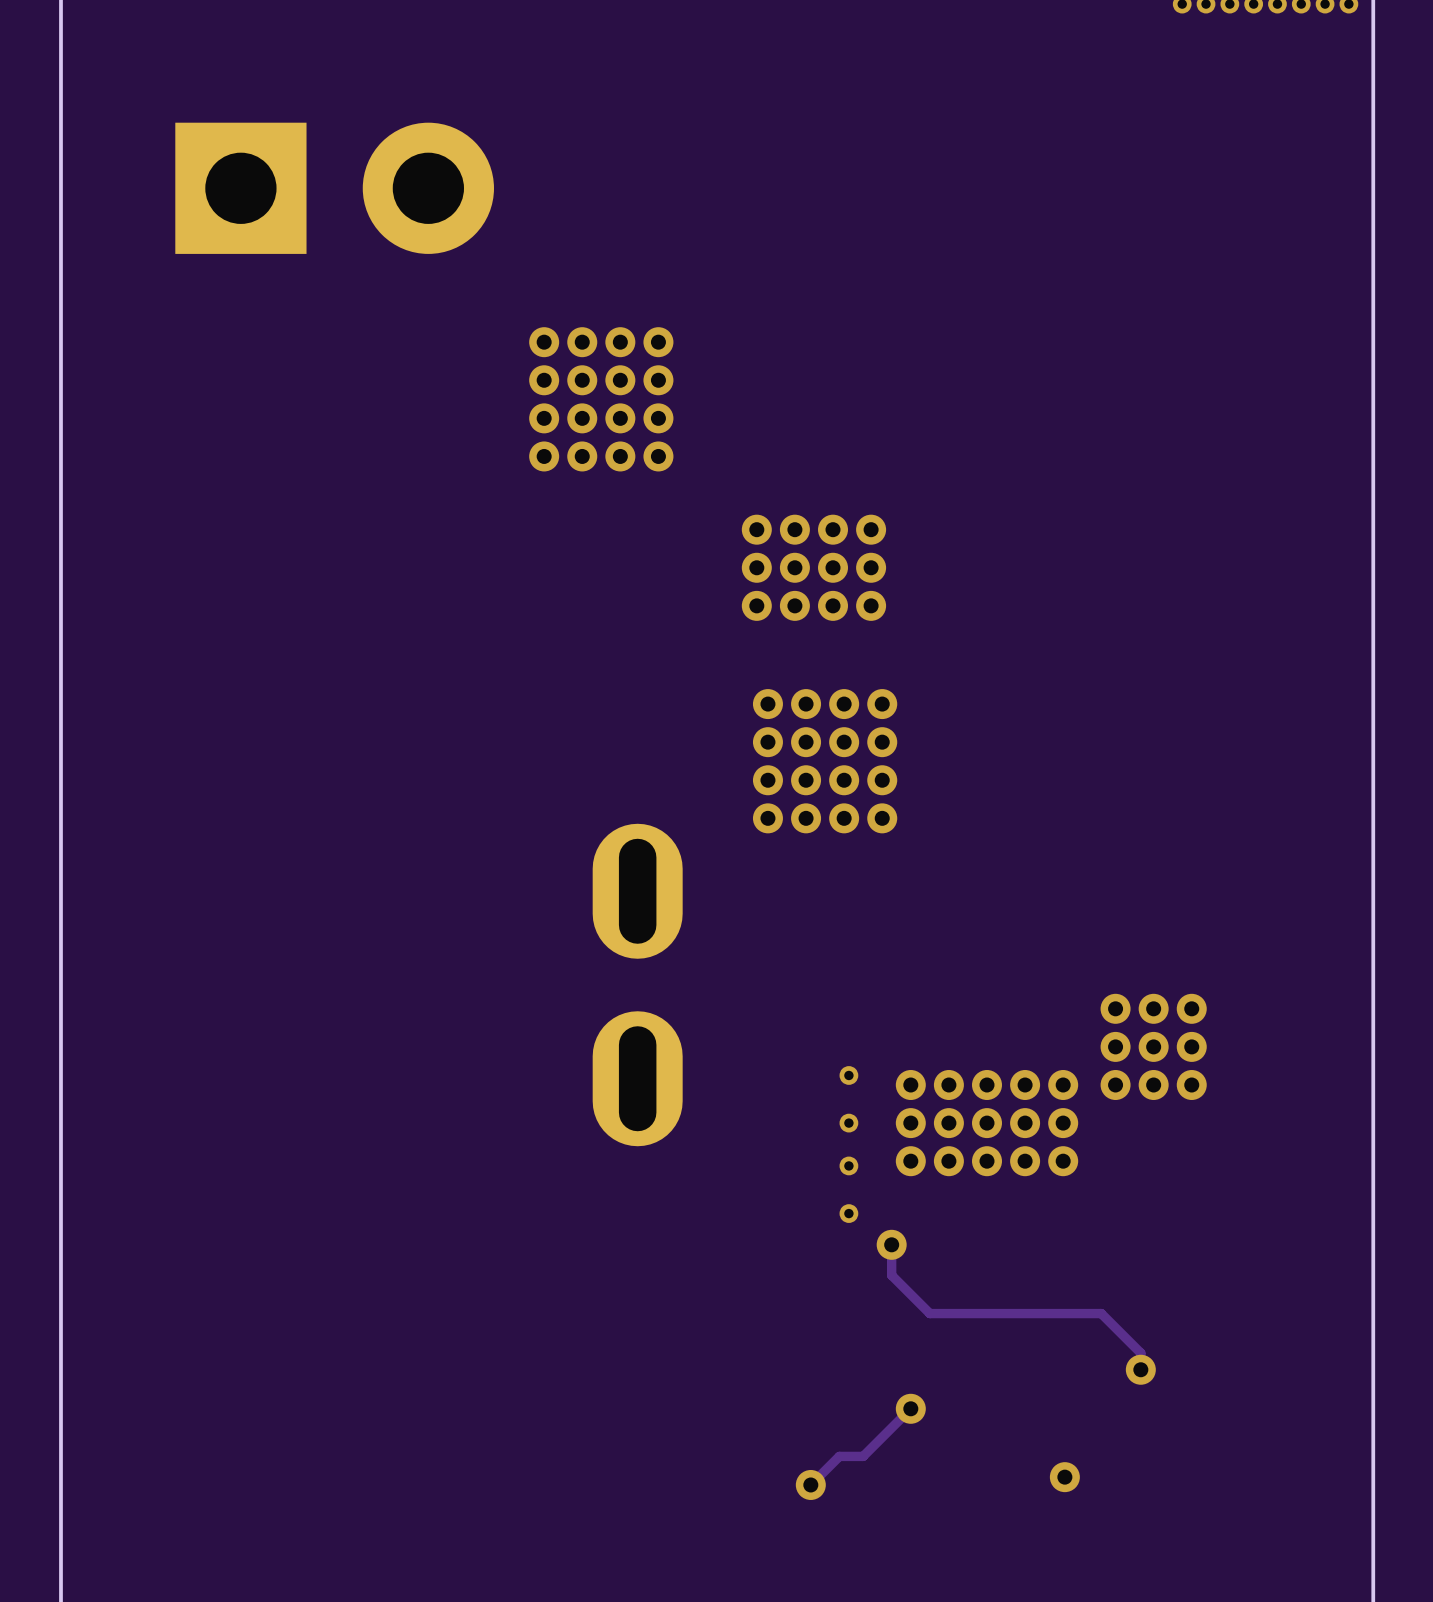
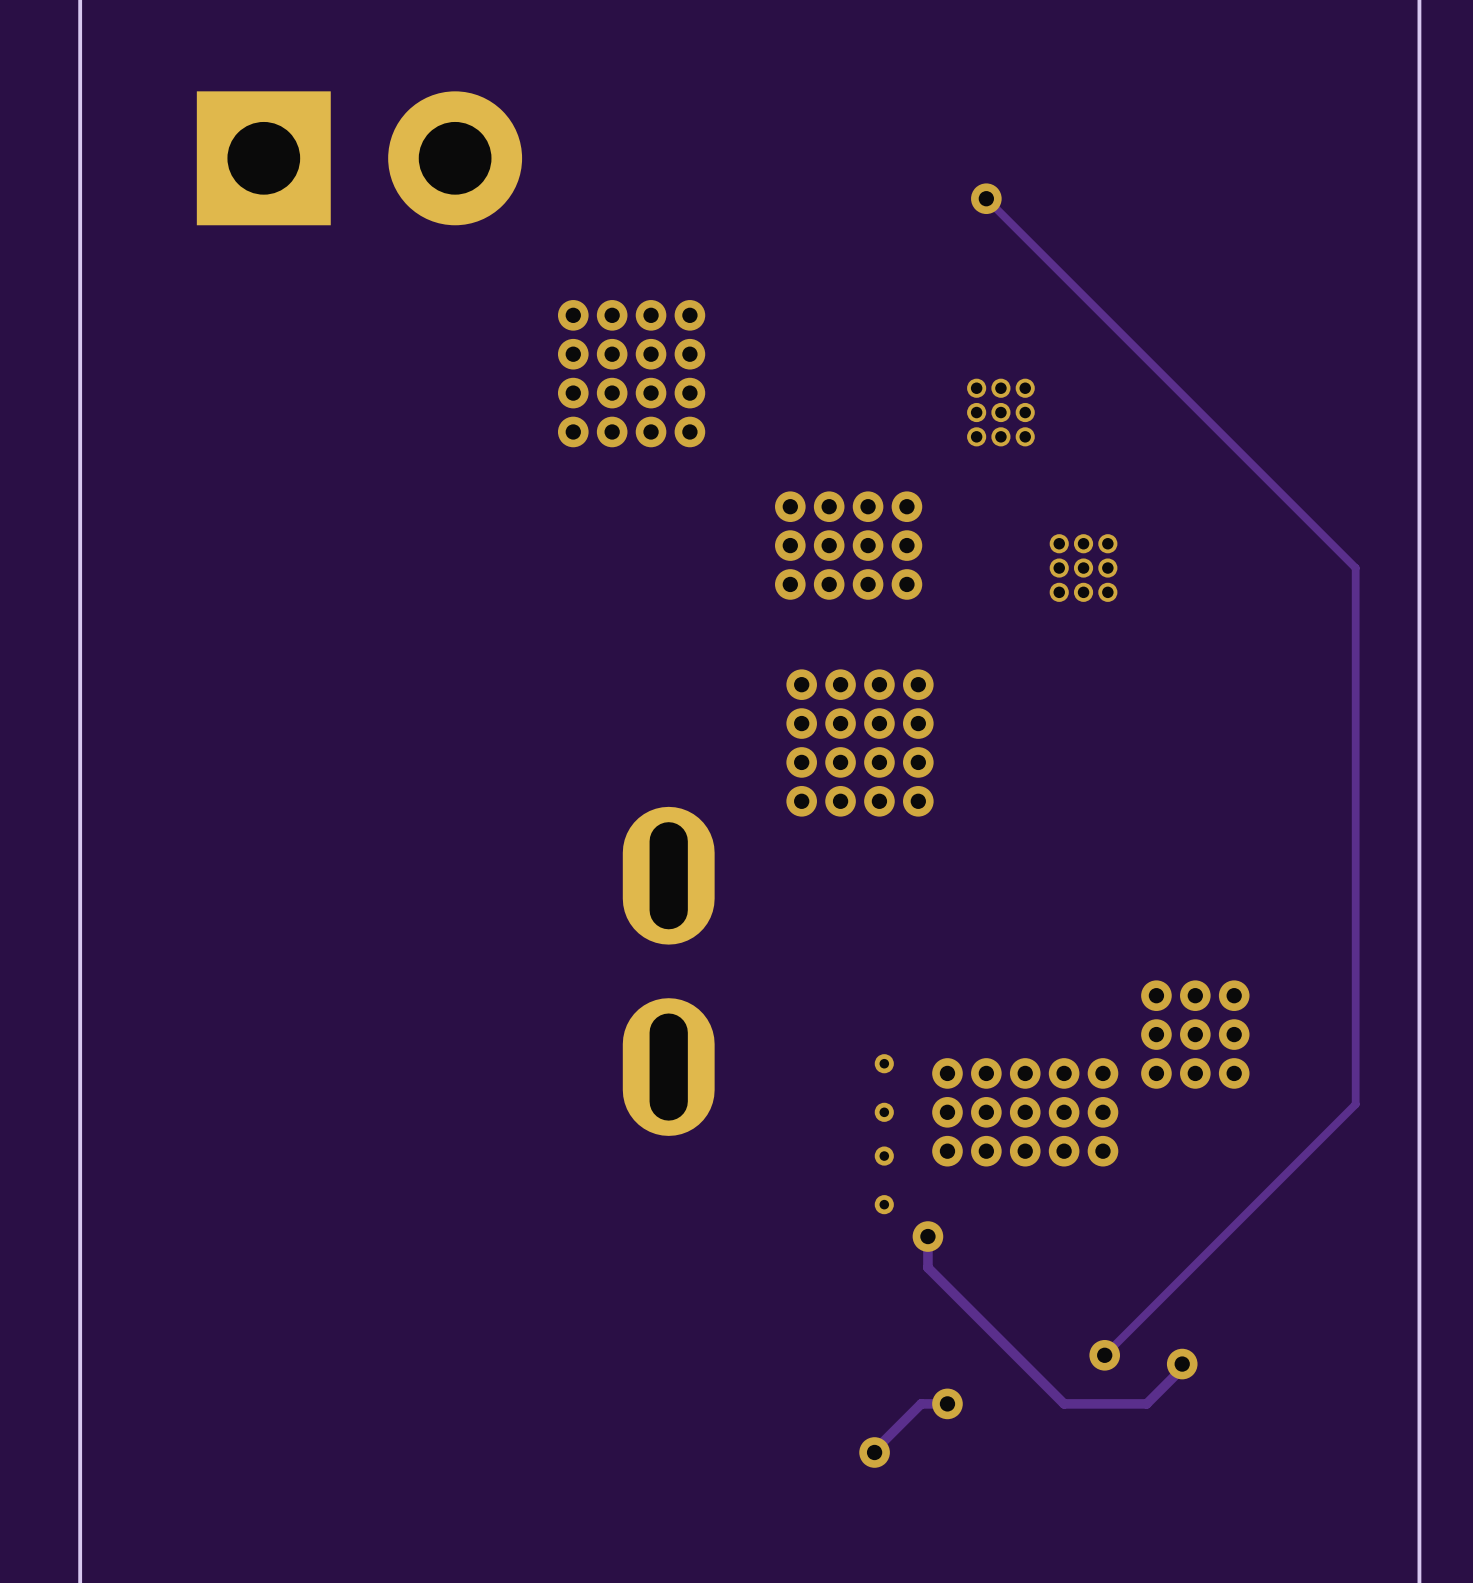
track: none -> (986, 198) (1355, 568) (1355, 1104) (1104, 1355)
via: none -> (986, 198)
via: none -> (976, 388)
via: none -> (1000, 388)
via: none -> (1025, 388)
via: none -> (976, 412)
via: none -> (1000, 412)
via: none -> (1025, 412)
via: none -> (976, 436)
via: none -> (1000, 436)
via: none -> (1025, 436)
via: none -> (1059, 543)
via: none -> (1083, 543)
via: none -> (1107, 543)
via: none -> (1059, 568)
via: none -> (1083, 568)
via: none -> (1107, 568)
via: none -> (1059, 592)
via: none -> (1083, 592)
via: none -> (1107, 592)
track: (929, 1313) (1101, 1313) (1140, 1353) (1140, 1369) -> (966, 1306) (1064, 1403) (1146, 1403) (1182, 1368) (1182, 1364)
via: none -> (1104, 1355)
track: (910, 1408) (863, 1456) (839, 1456) (810, 1484) -> (947, 1403) (921, 1403) (874, 1452)
via: (1064, 1477) -> none
via position: (810, 1484) -> (874, 1452)

